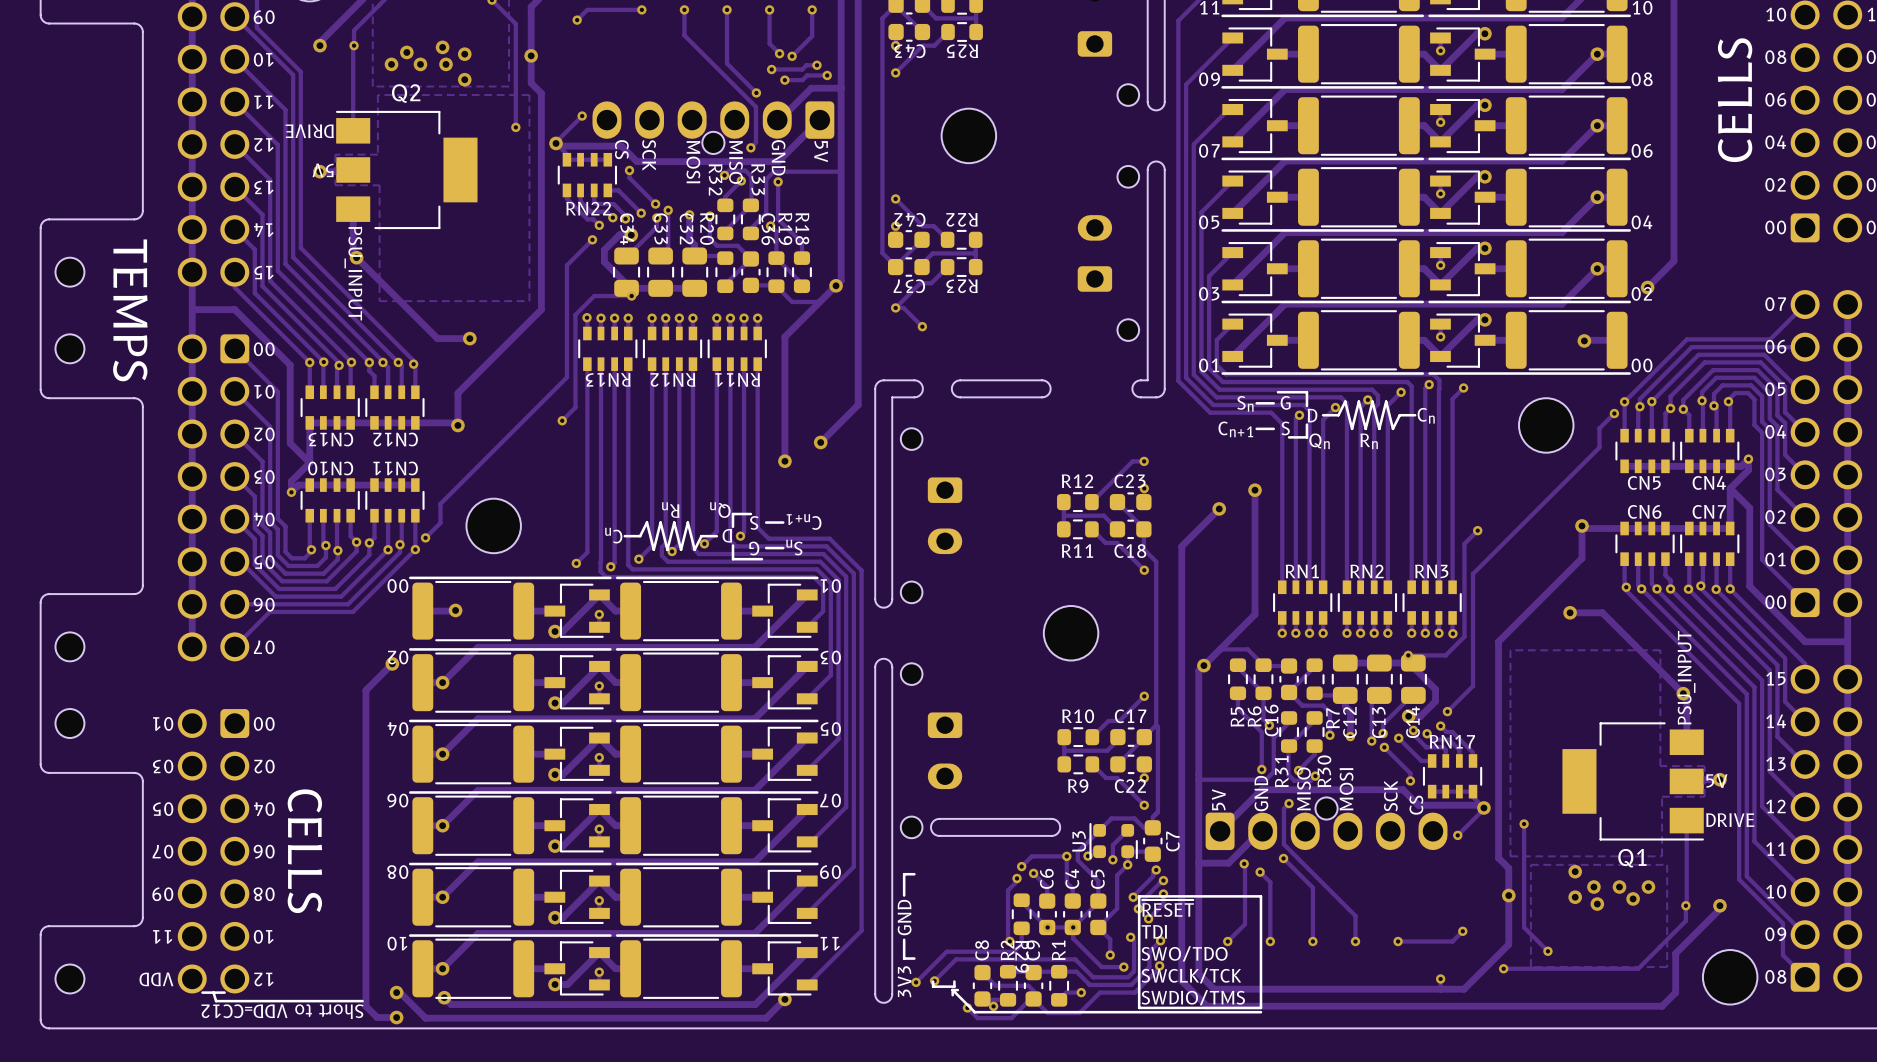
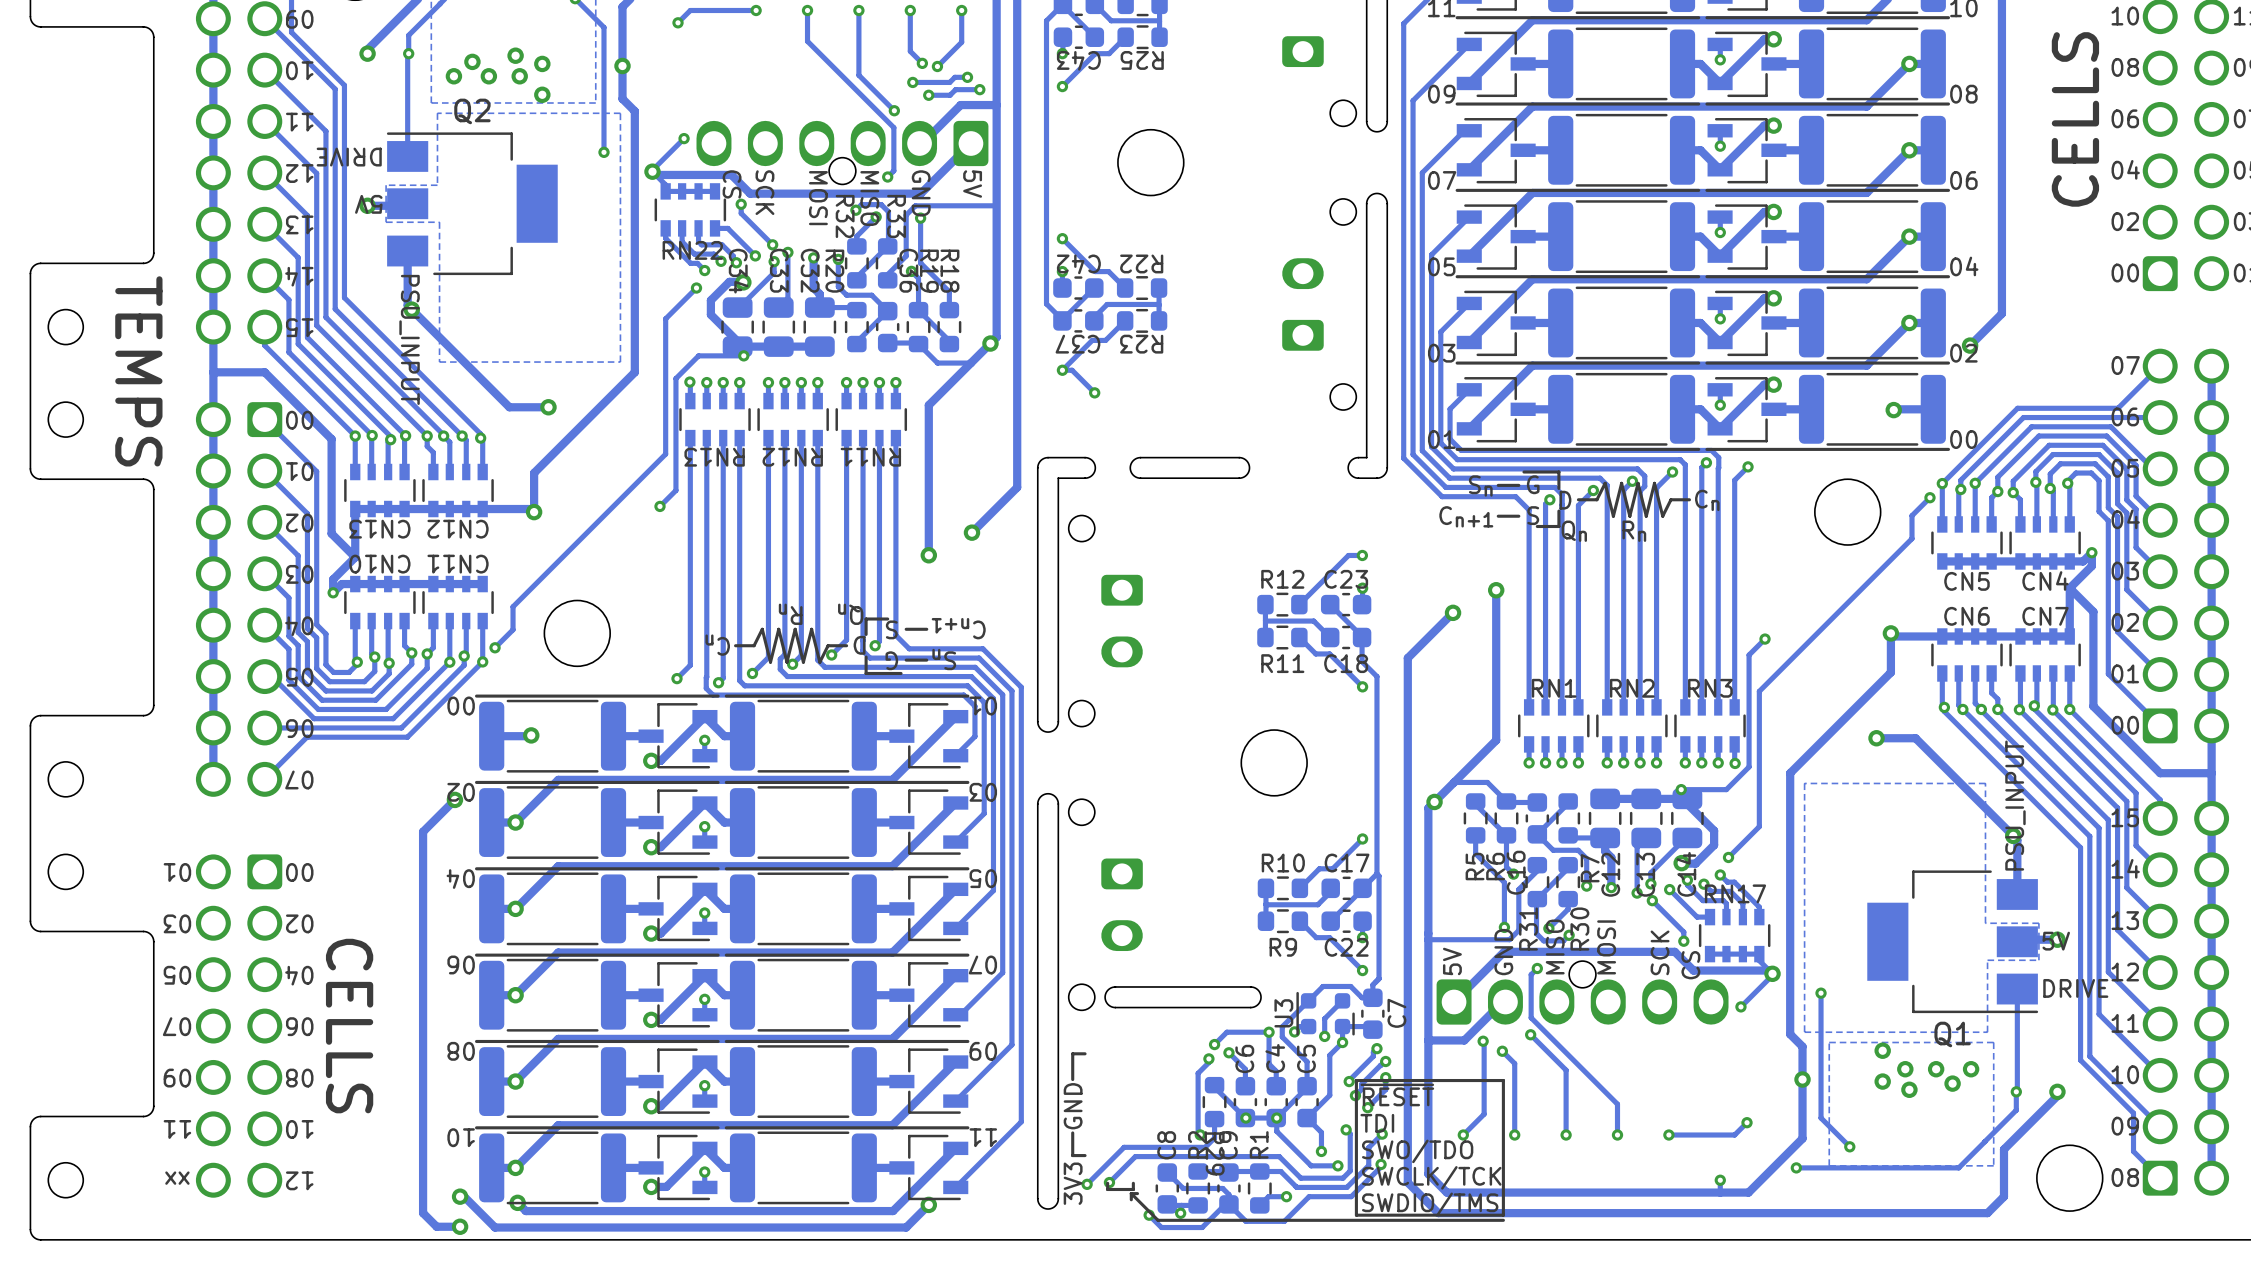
text: VDD (156, 979) -> xx (177, 1178)
line: (213, 992) (216, 1001) (362, 1001) -> none
line: (224, 992) (202, 992) -> none
text: Short to VDD=CC12 (282, 1011) -> none

